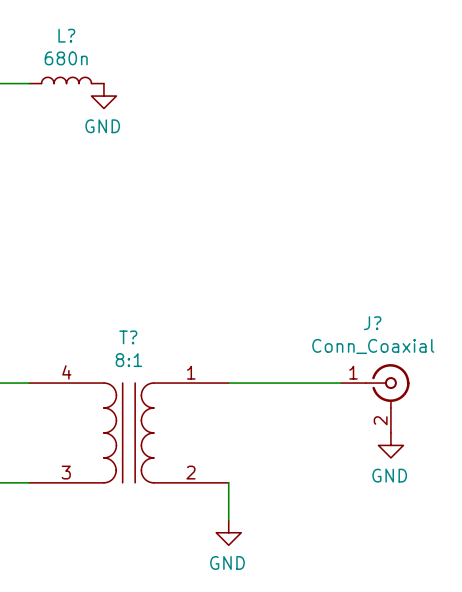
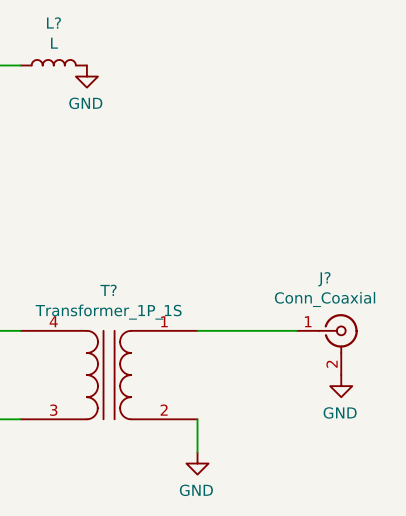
L? value: 680n (66, 58) -> L (54, 43)
T? value: 8:1 (128, 360) -> Transformer_1P_1S (108, 312)

